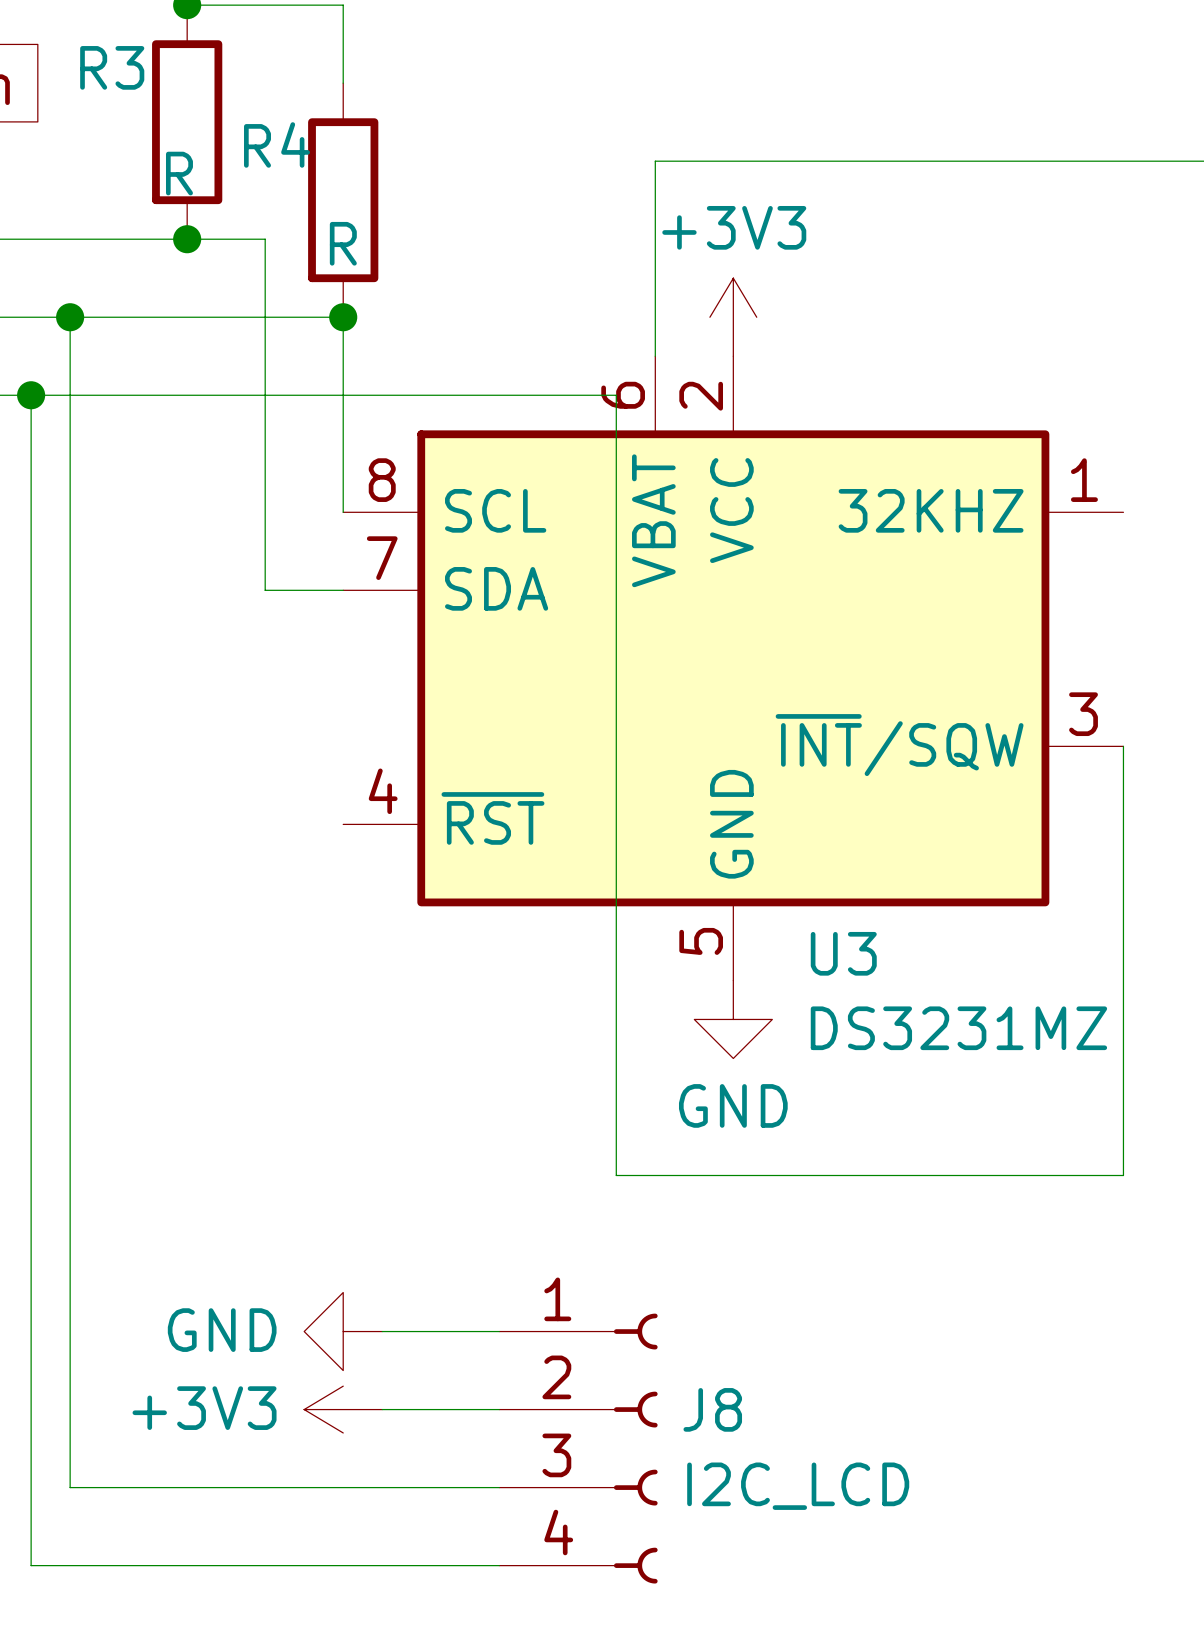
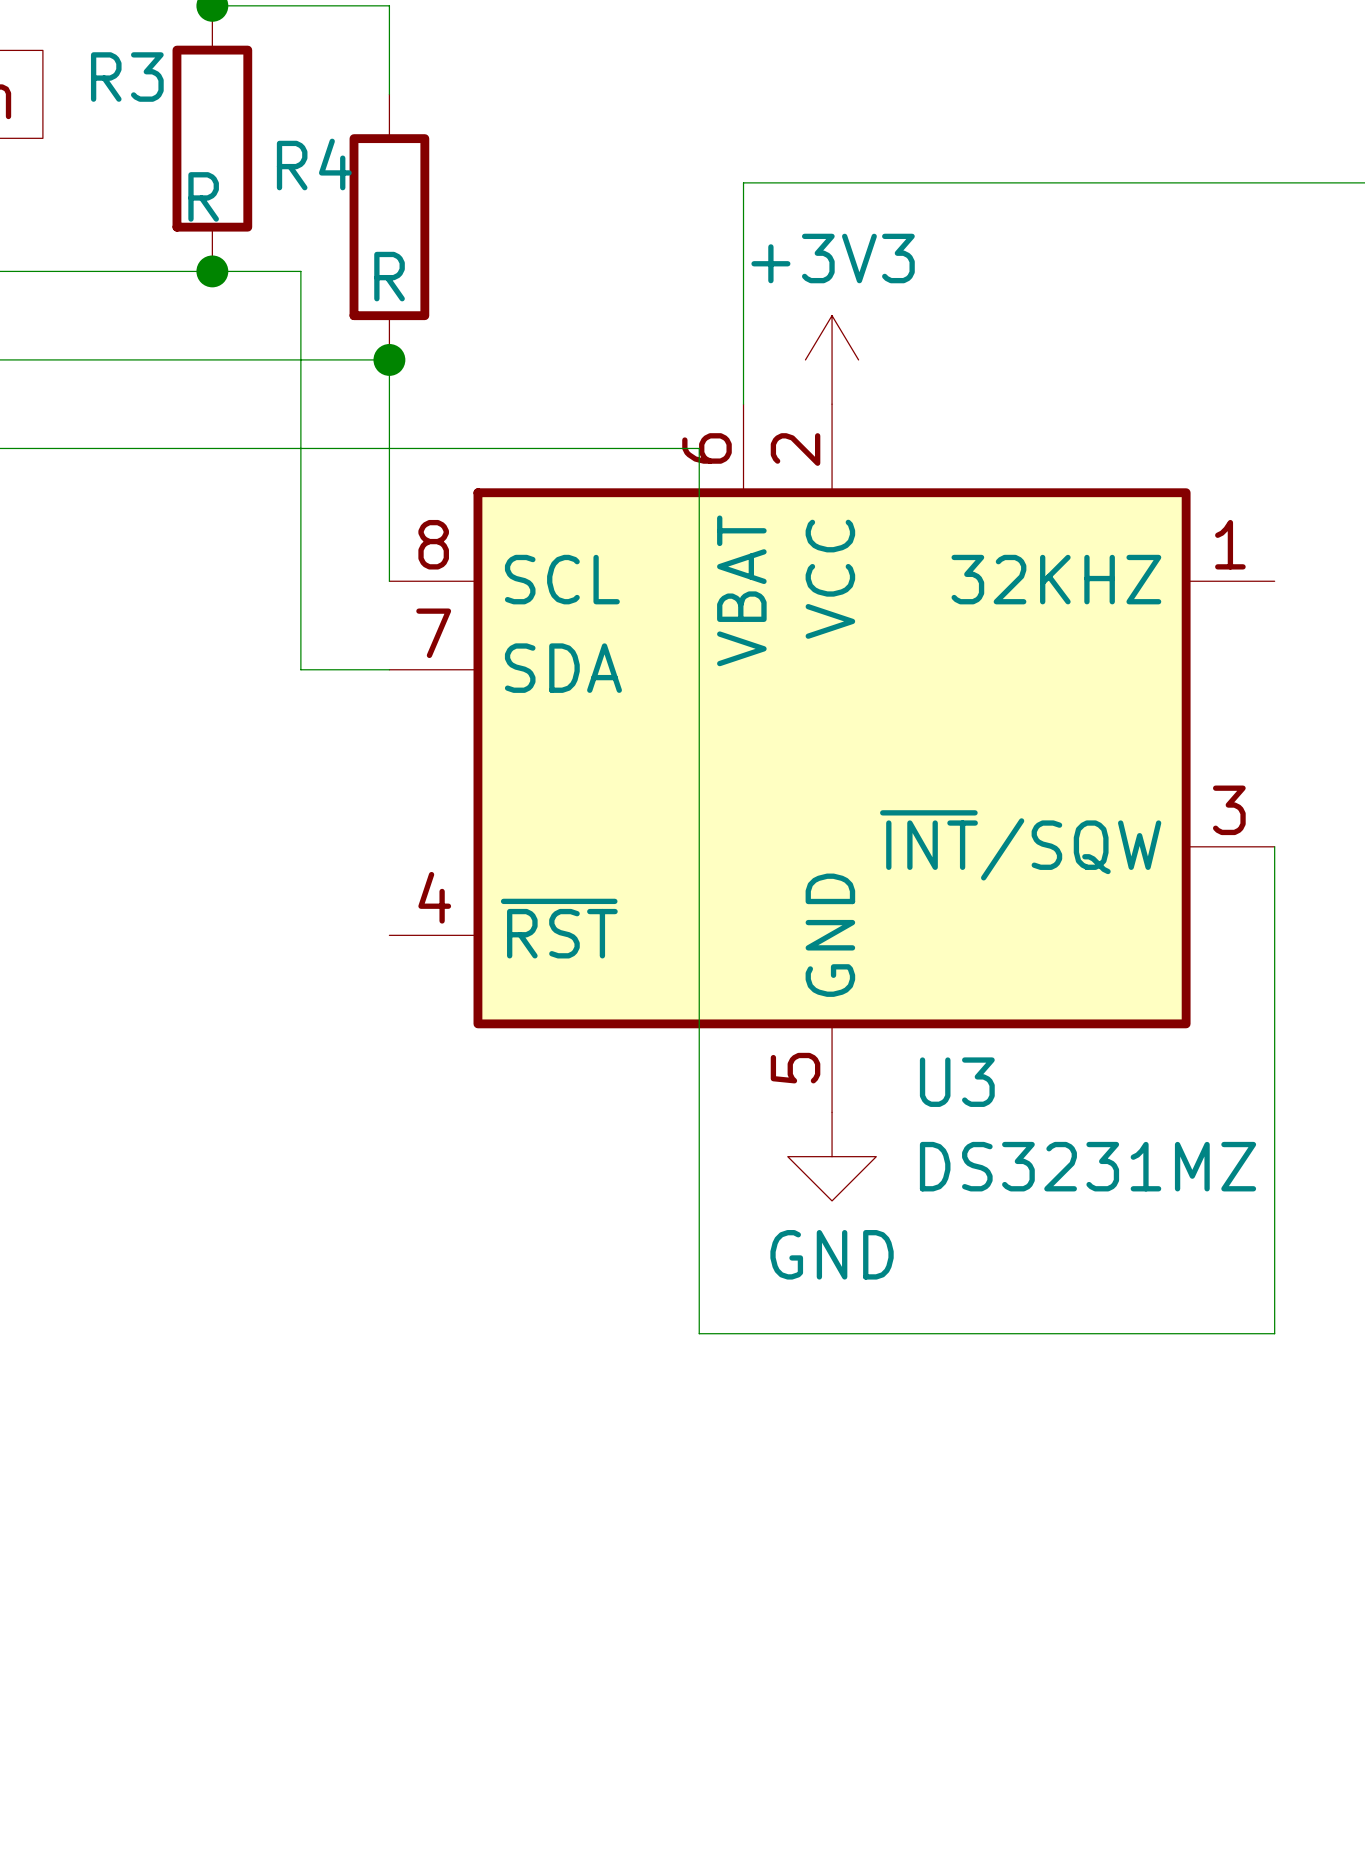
wire: (70, 317) (70, 1487) (499, 1487) -> none
junction: (70, 317) -> none
wire: (31, 395) (31, 1565) (499, 1565) -> none
junction: (31, 395) -> none
power symbol: GND (343, 1331) -> none
wire: (382, 1331) (499, 1331) -> none
power symbol: +3V3 (343, 1409) -> none
wire: (382, 1409) (499, 1409) -> none
J8: I2C_LCD (578, 1448) -> none

